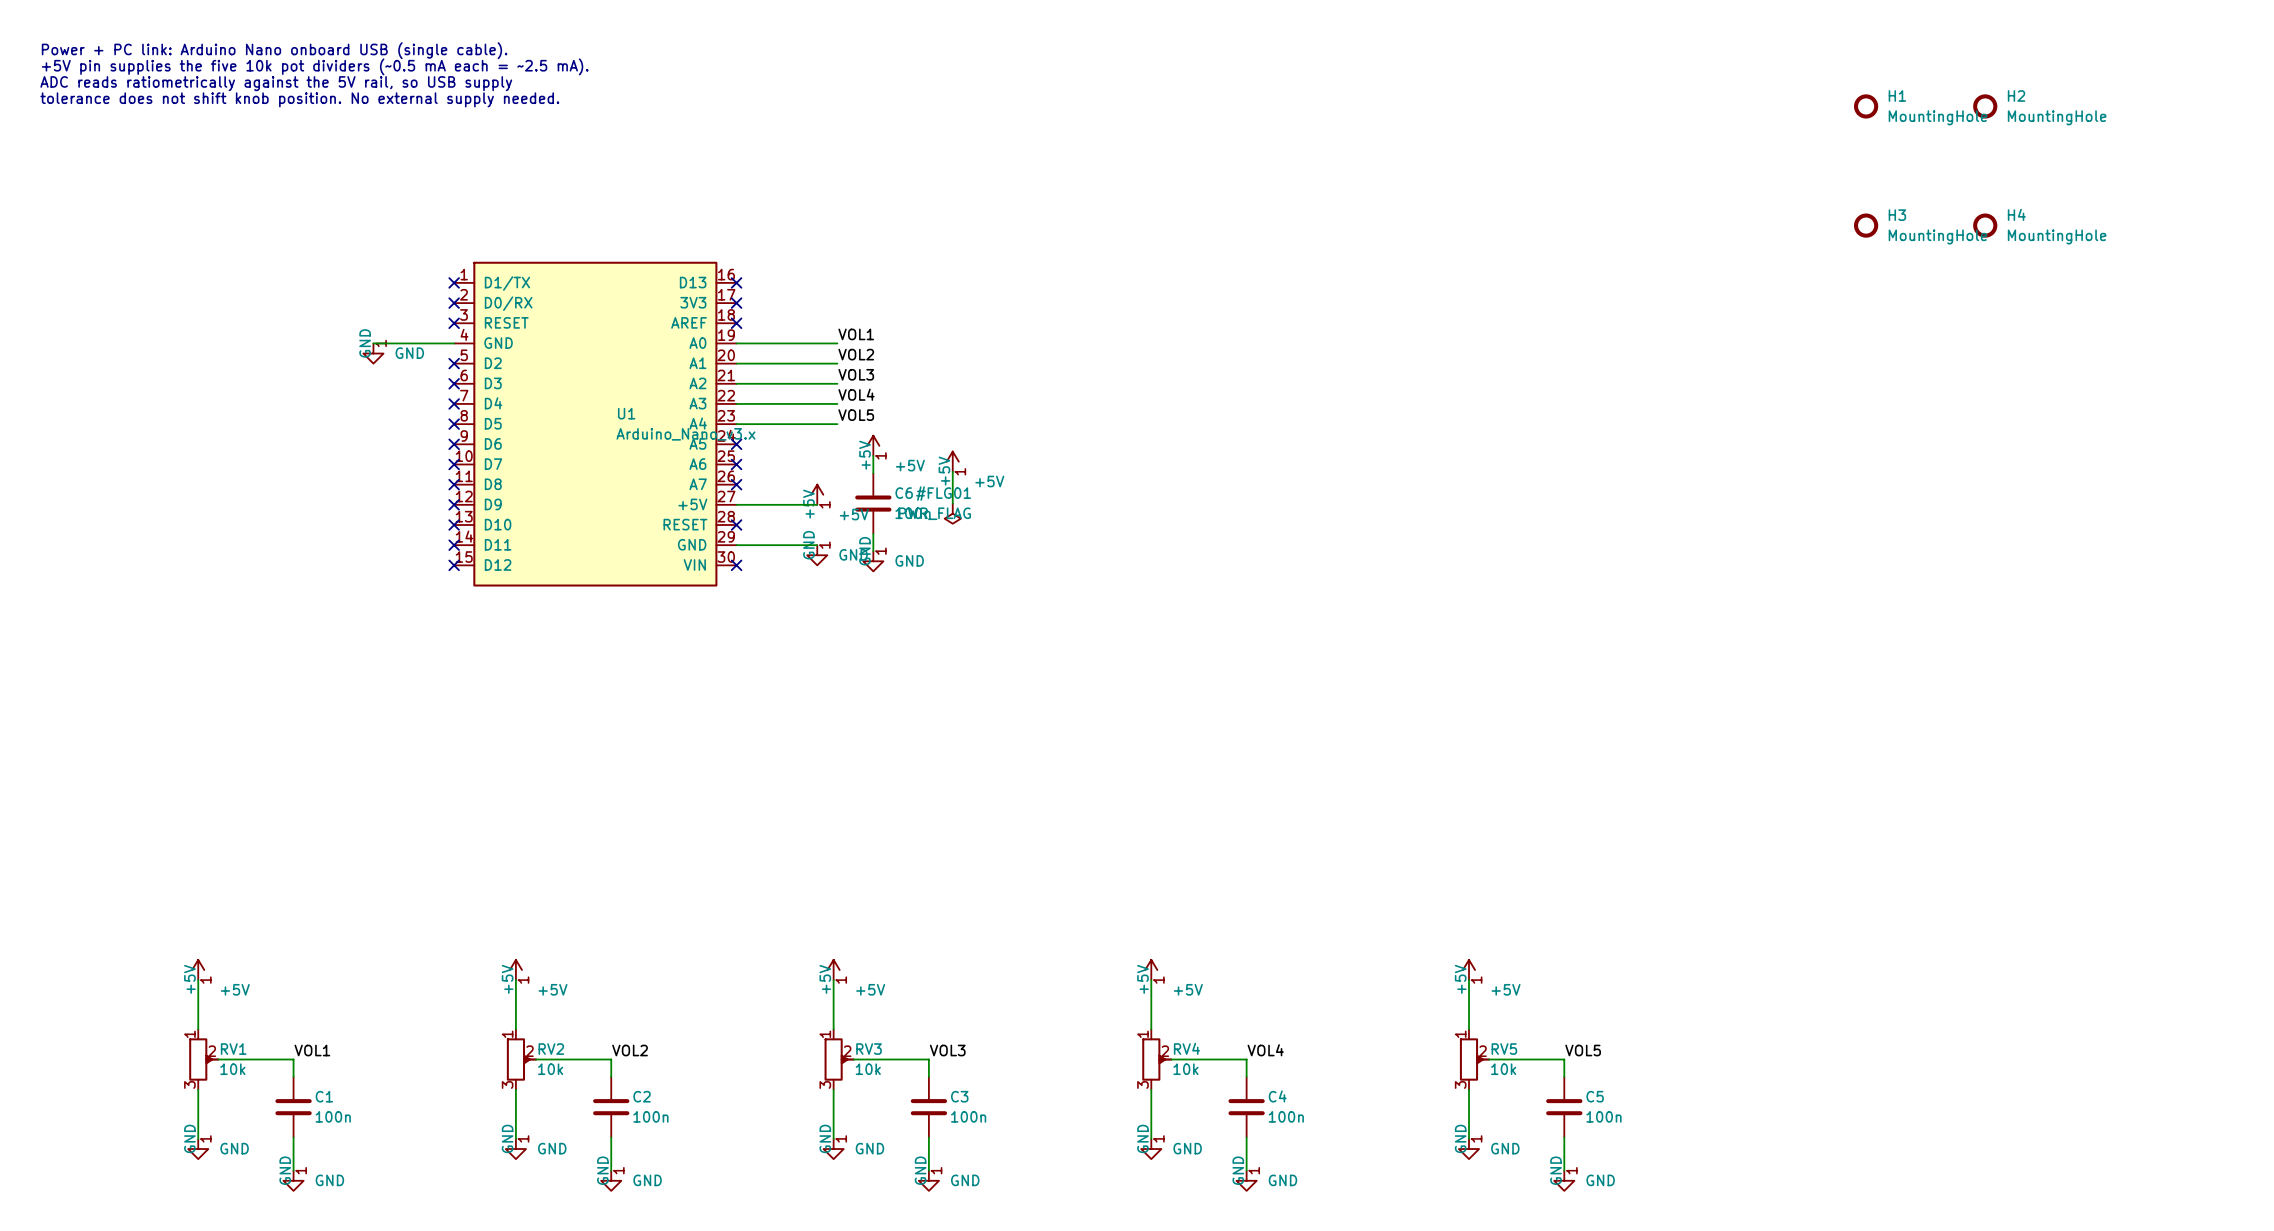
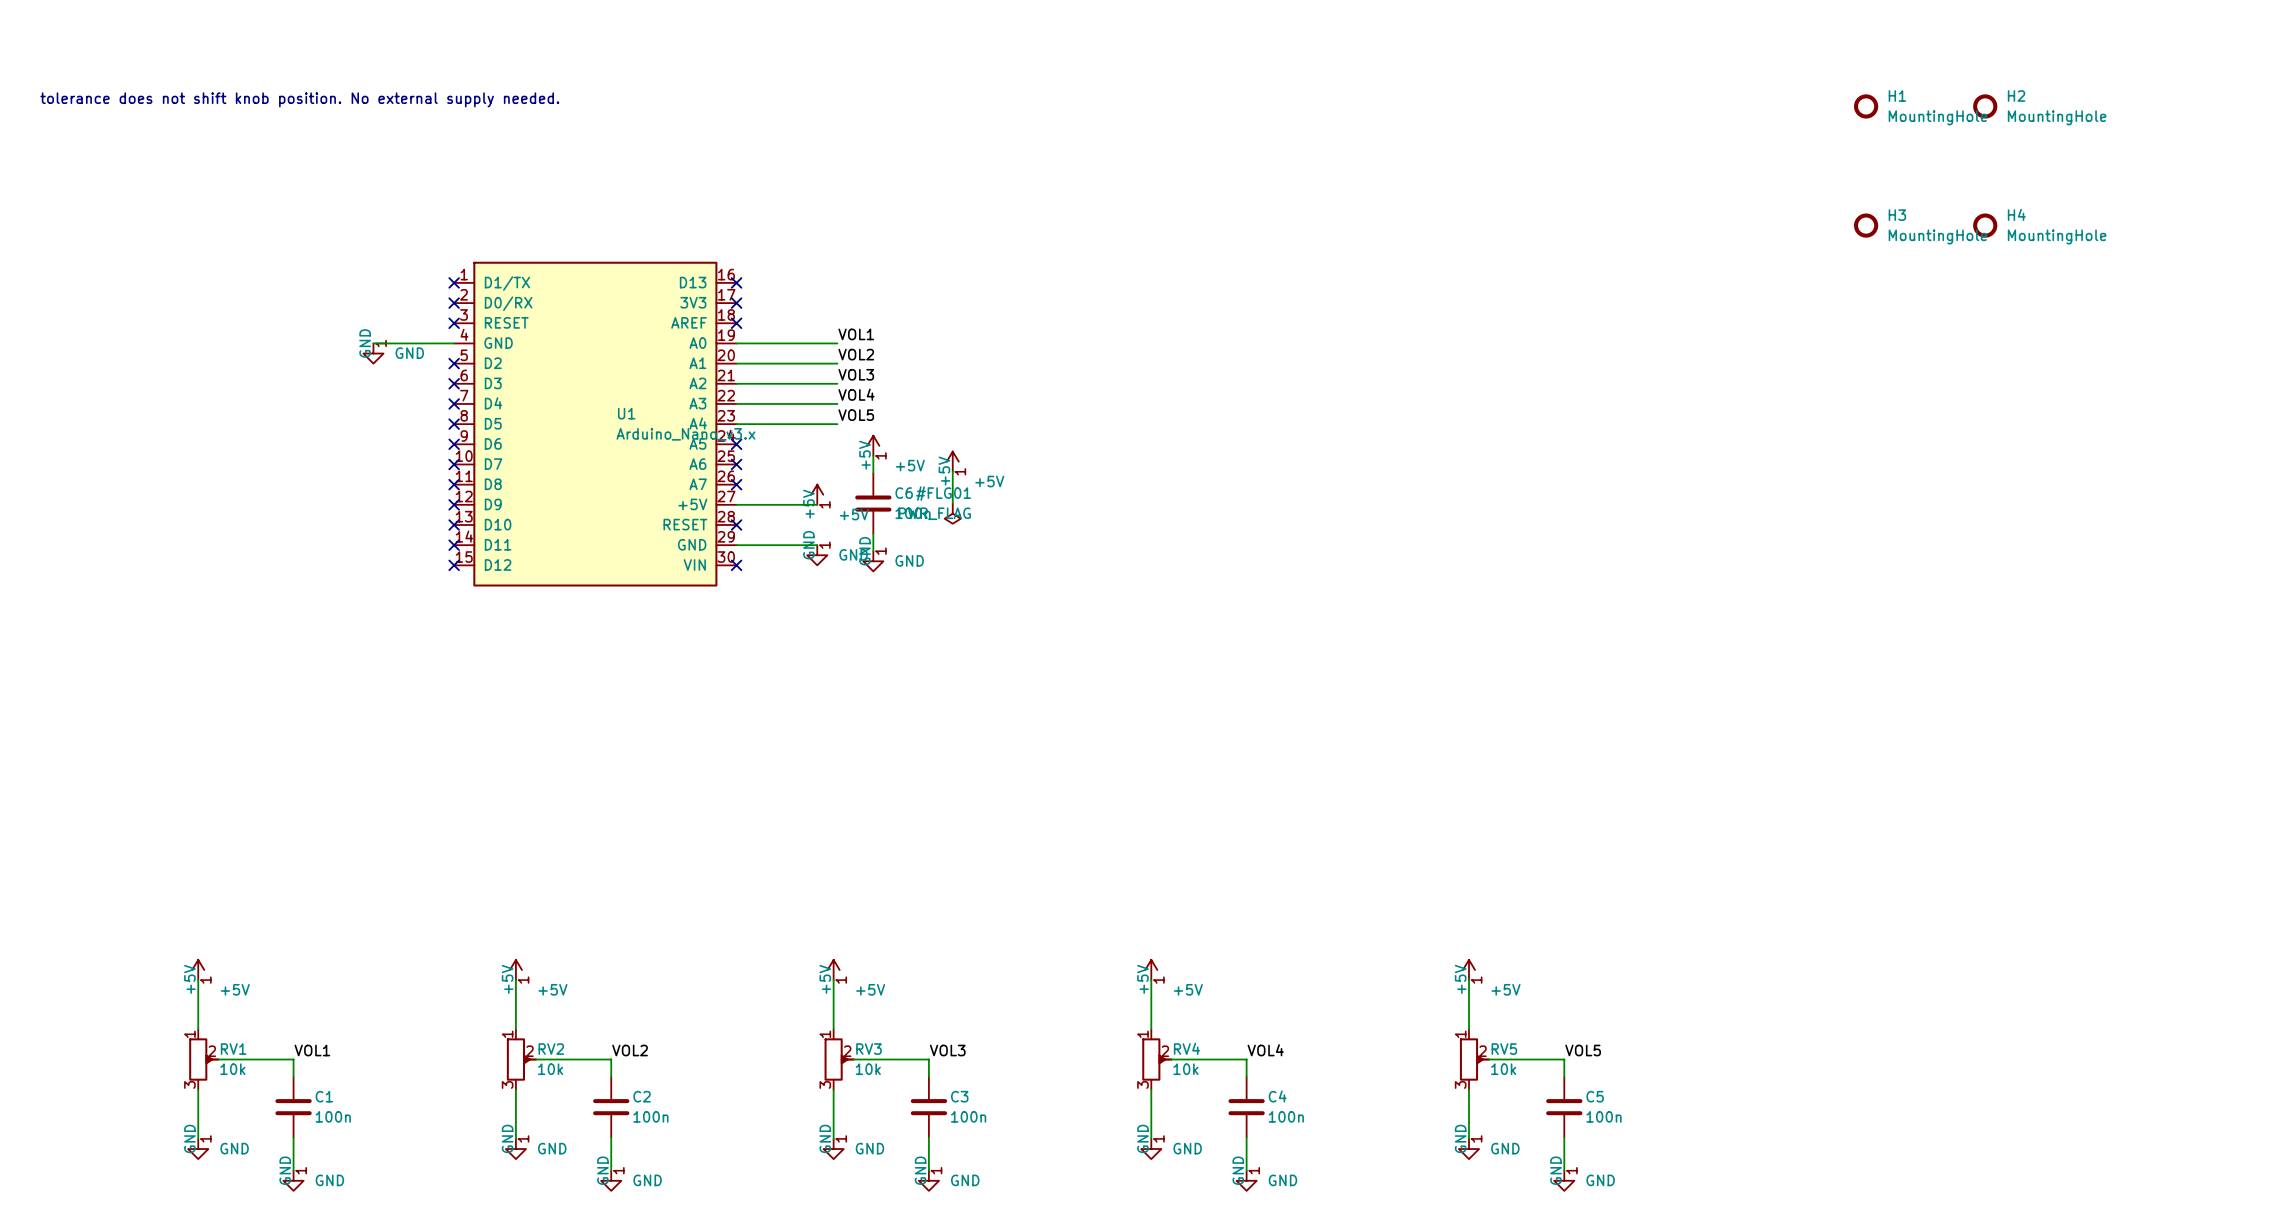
text: Power + PC link: Arduino Nano onboard USB (single cable). (274, 50) -> none
text: +5V pin supplies the five 10k pot dividers (~0.5 mA each = ~2.5 mA). (315, 66) -> none
text: ADC reads ratiometrically against the 5V rail, so USB supply (276, 83) -> none

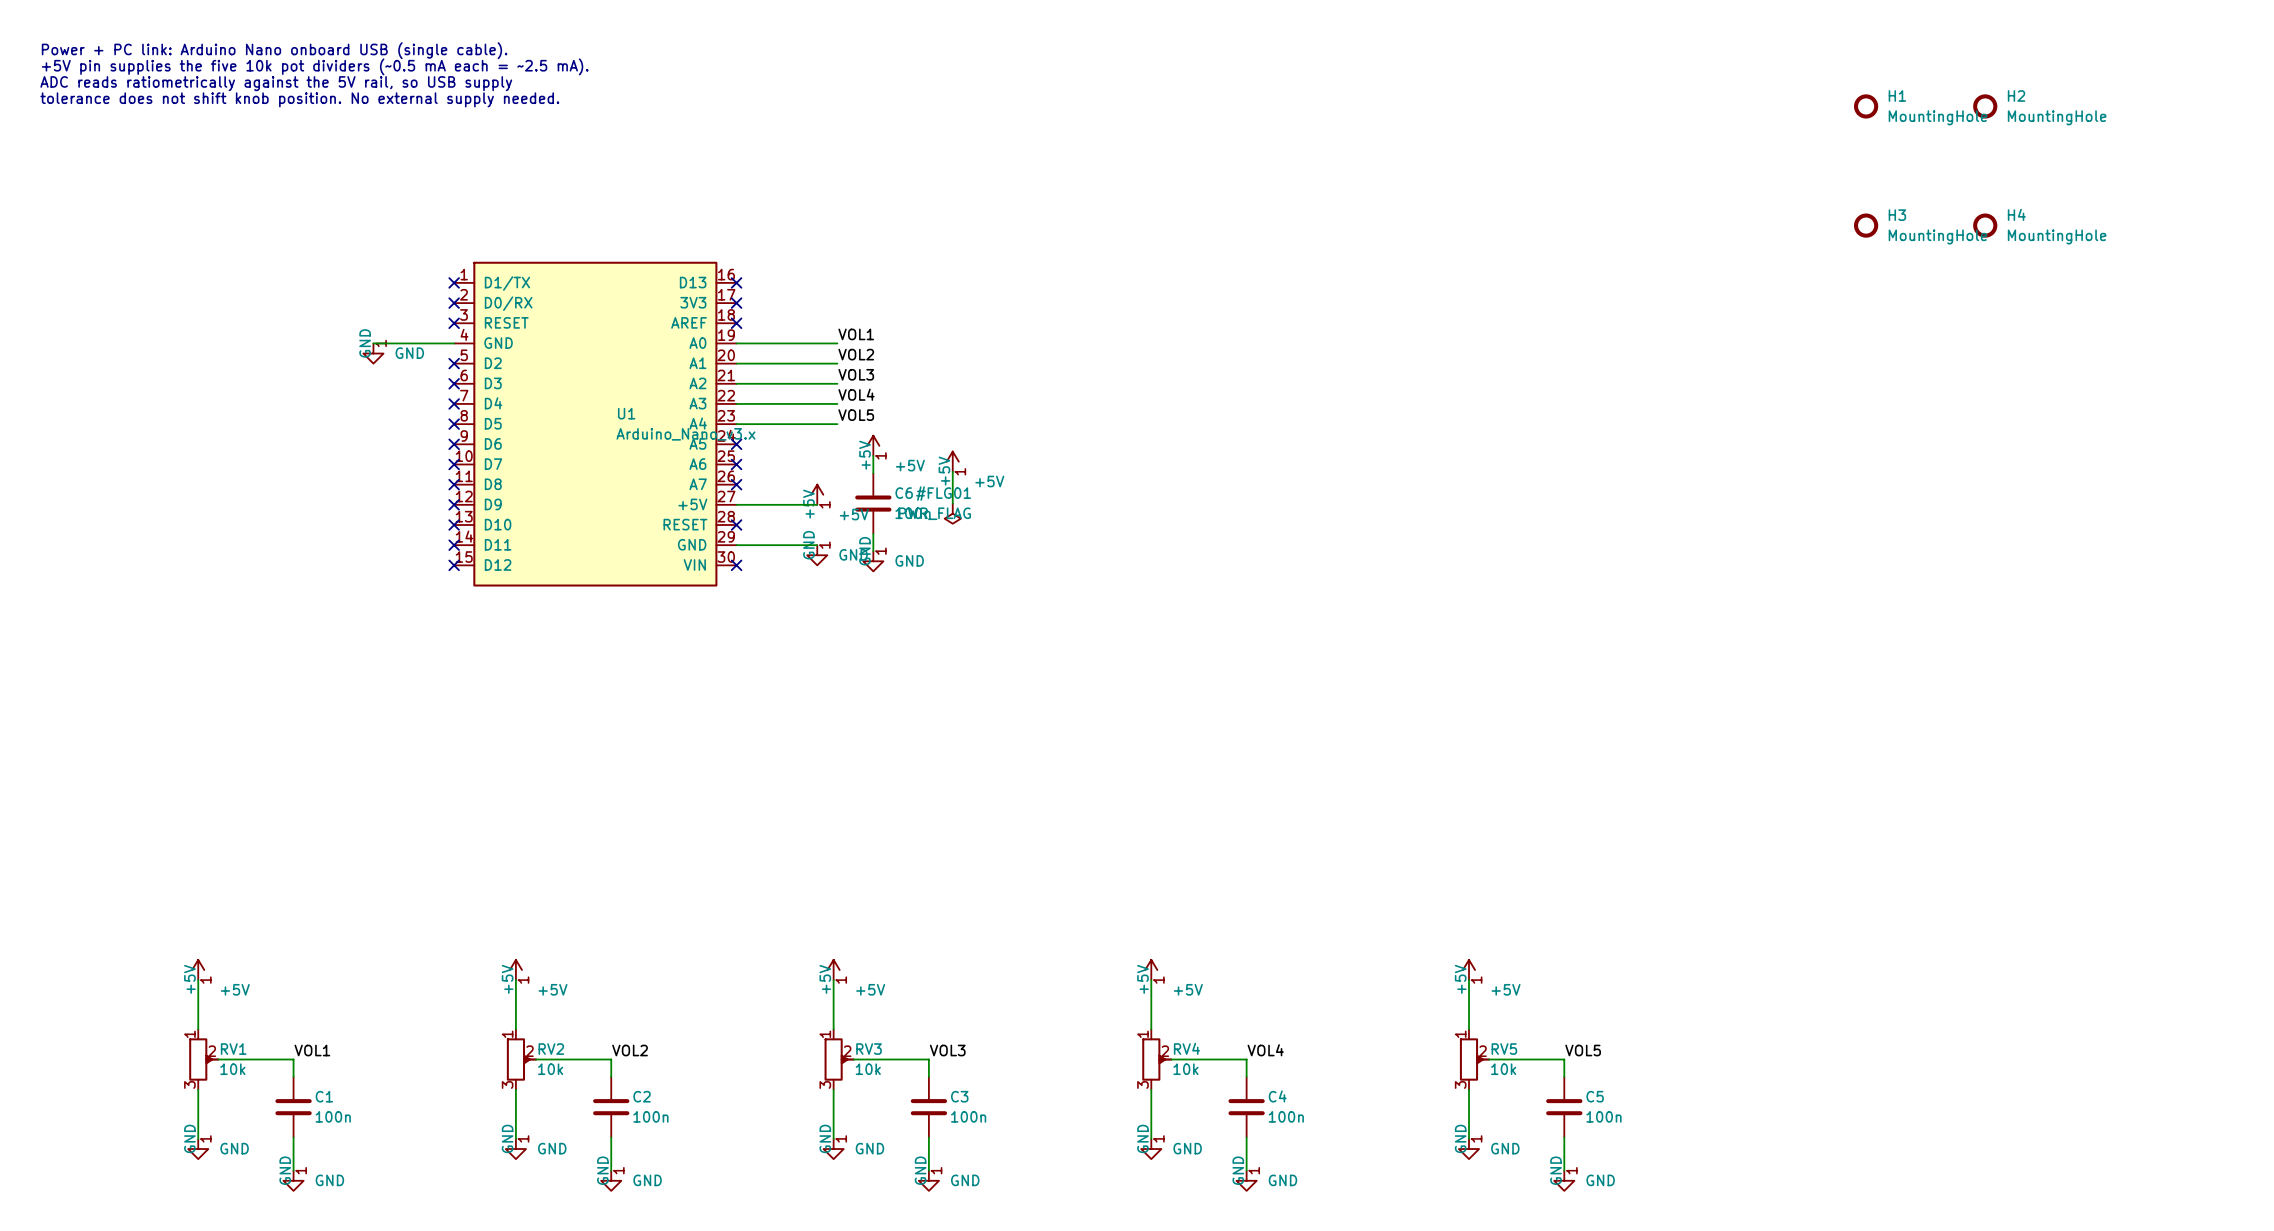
text: none -> Power + PC link: Arduino Nano onboard USB (single cable). (274, 50)
text: none -> +5V pin supplies the five 10k pot dividers (~0.5 mA each = ~2.5 mA). (315, 66)
text: none -> ADC reads ratiometrically against the 5V rail, so USB supply (276, 83)

